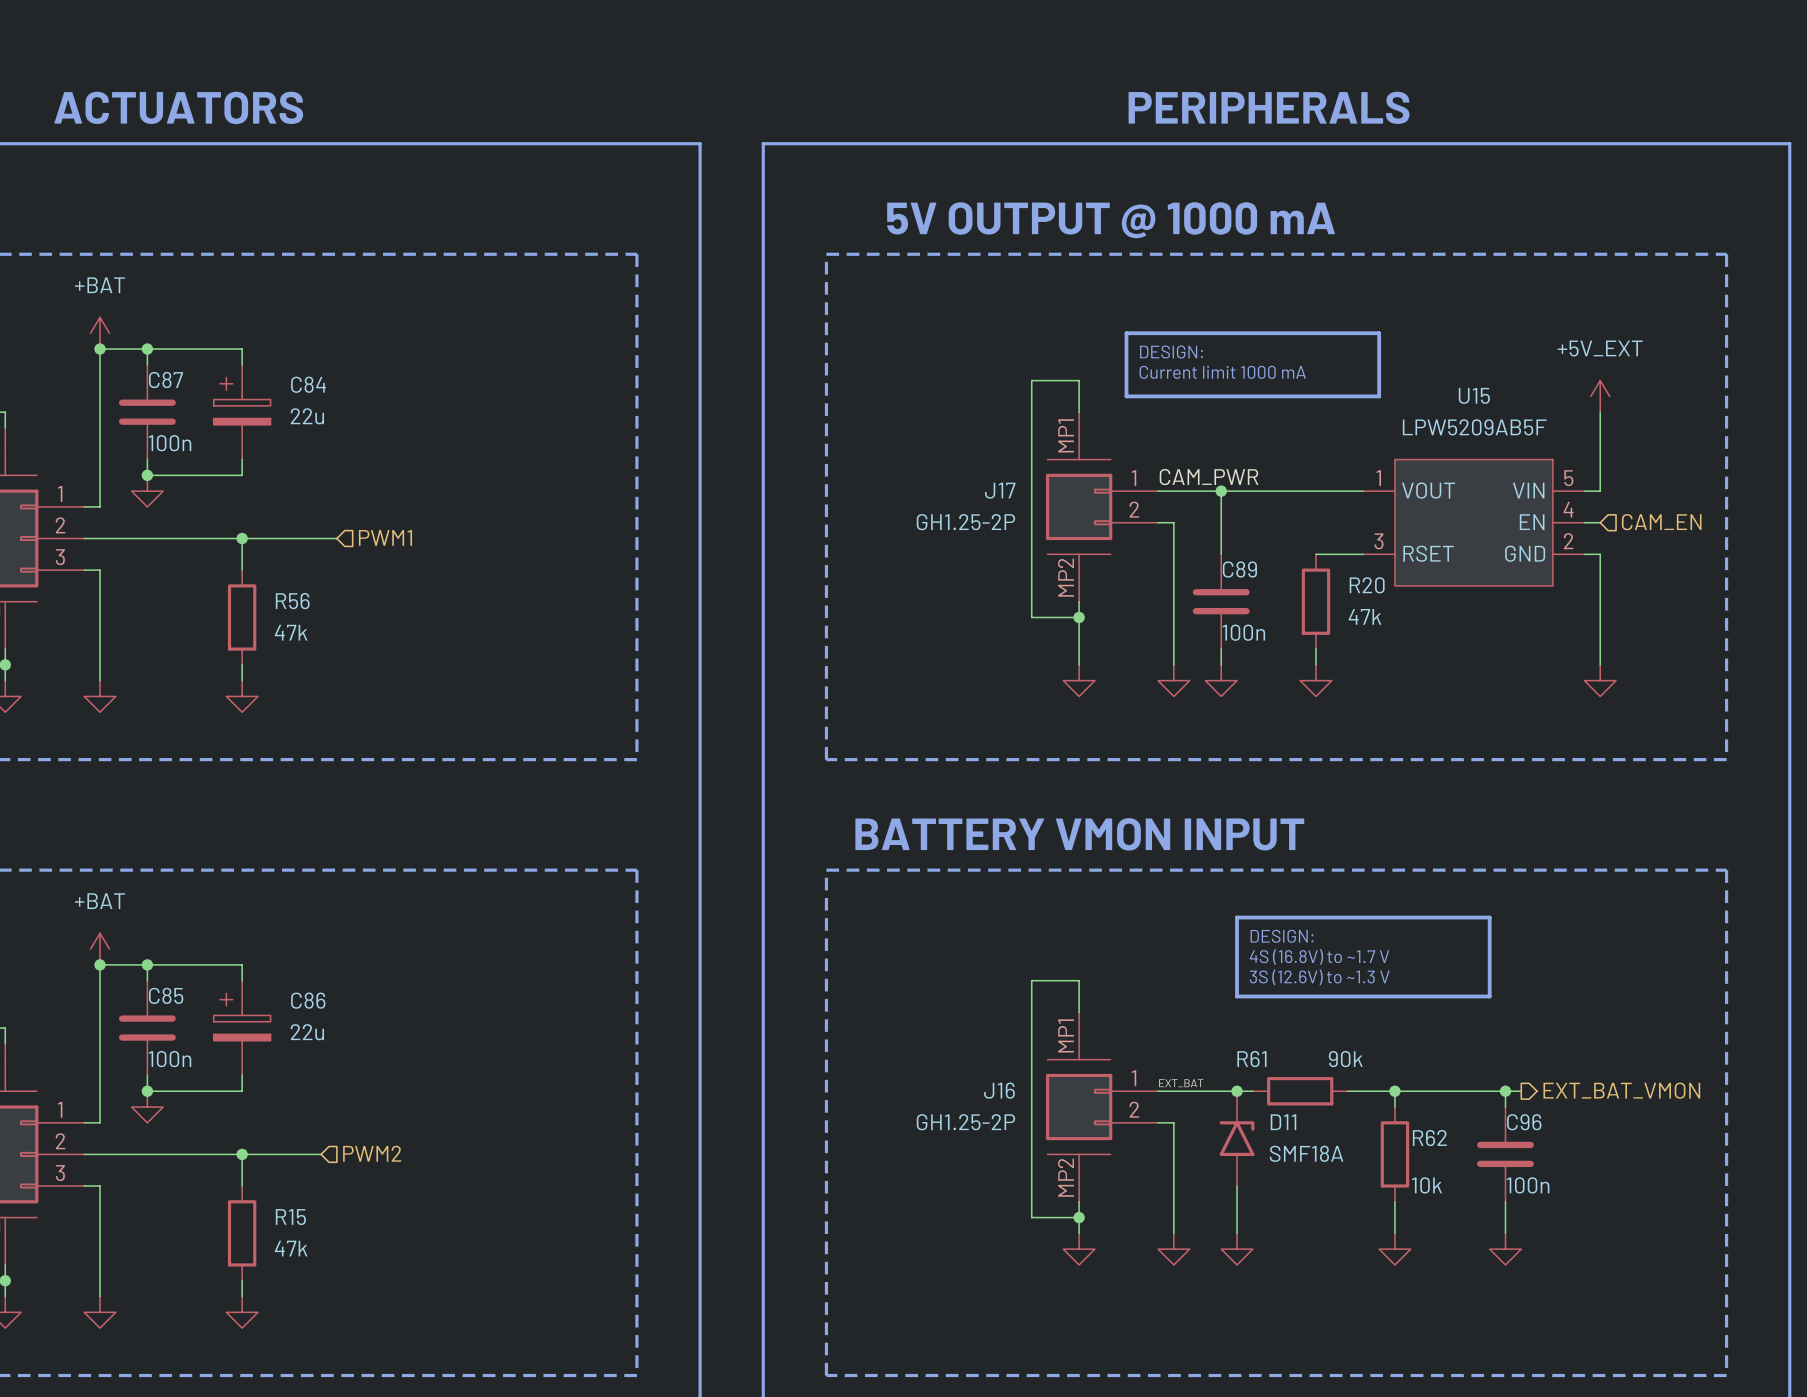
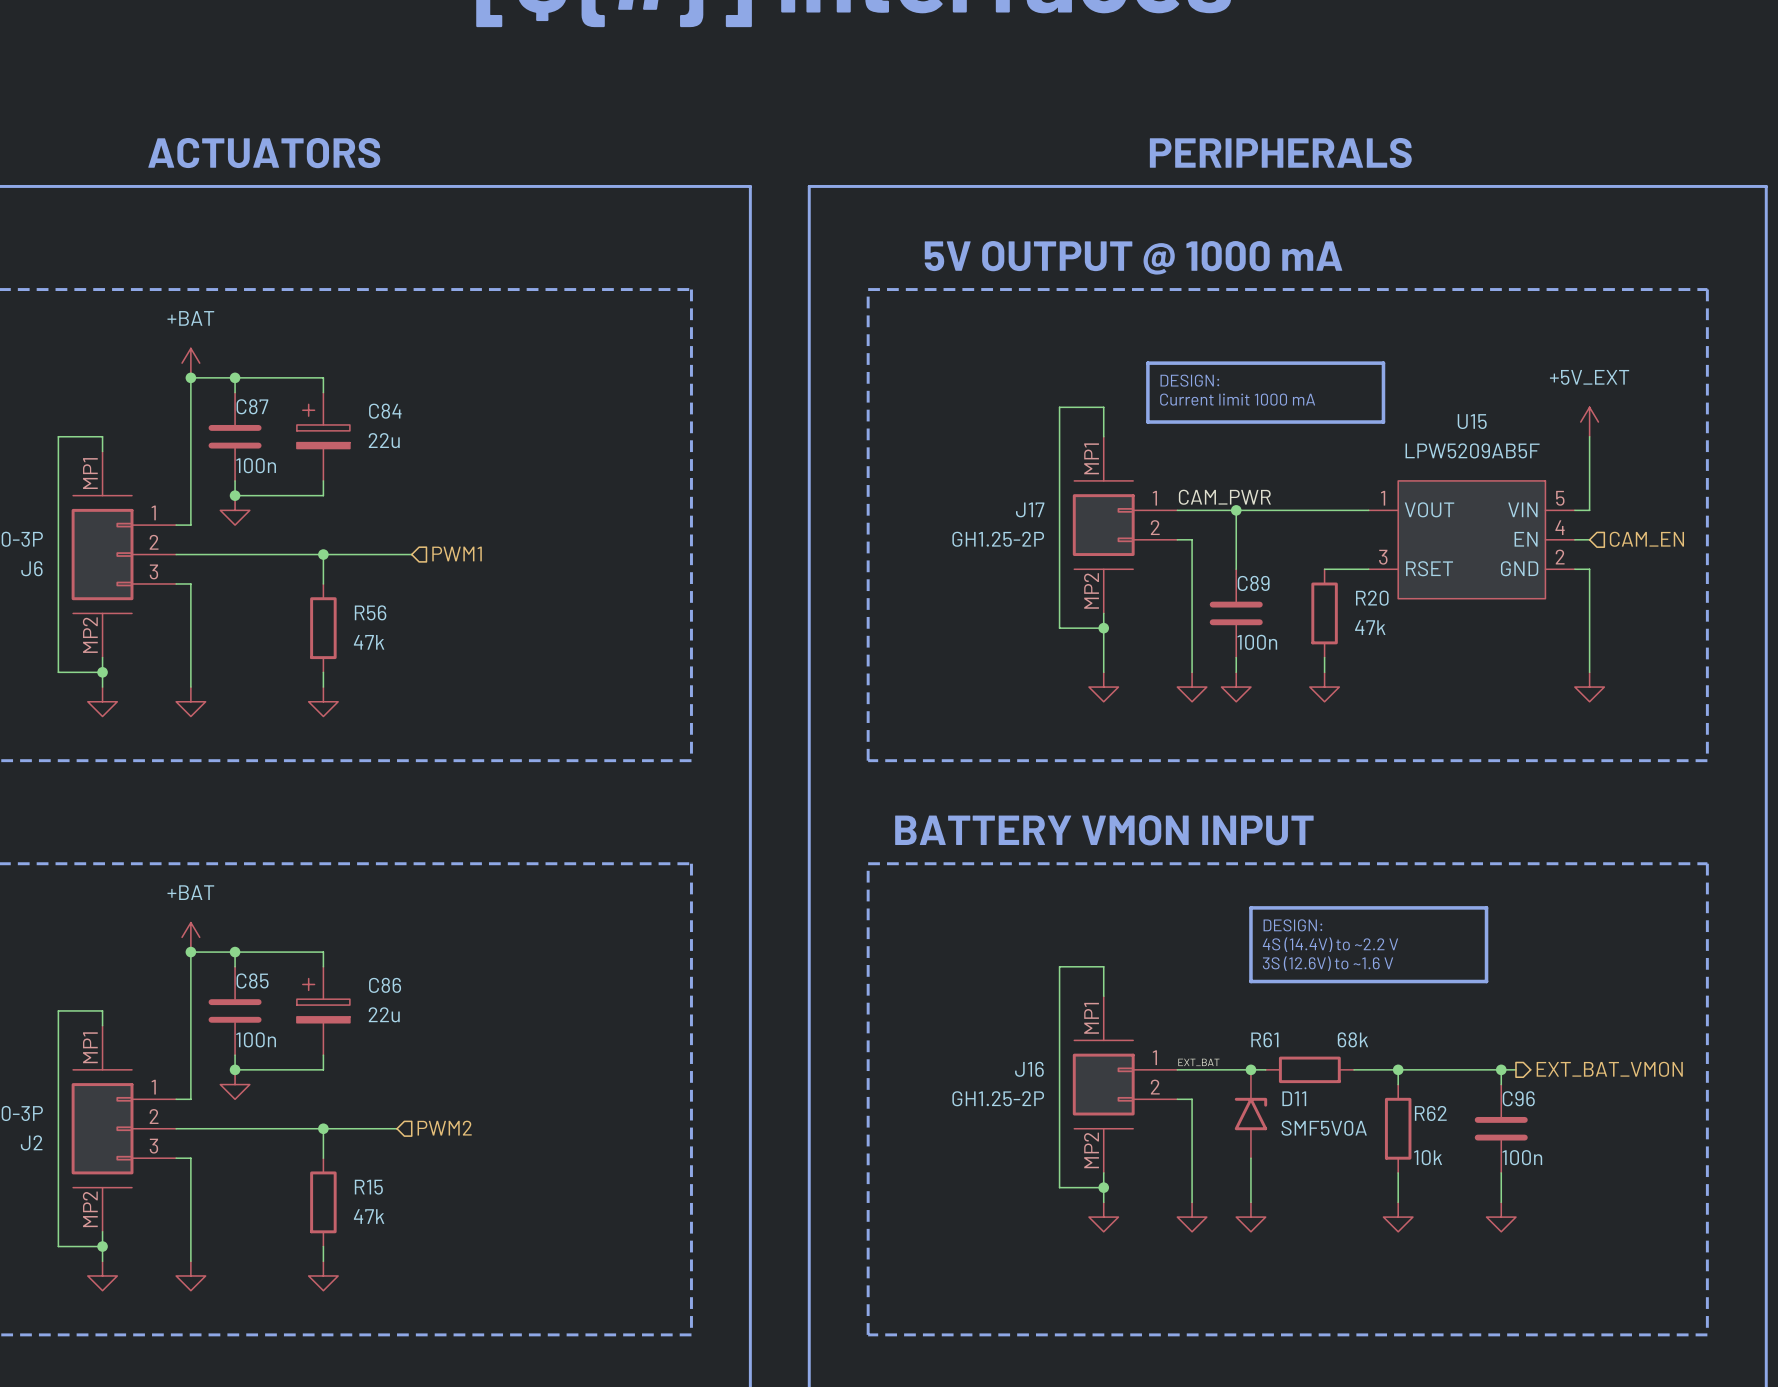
text: 4S (16.8V) to ~1.7 V (1319, 957) -> 4S (14.4V) to ~2.2 V (1330, 944)
text: 3S (12.6V) to ~1.3 V (1319, 977) -> 3S (12.6V) to ~1.6 V (1328, 963)
R61 value: 90k (1345, 1059) -> 68k (1352, 1039)
D11 value: SMF18A (1306, 1153) -> SMF5V0A (1324, 1128)

